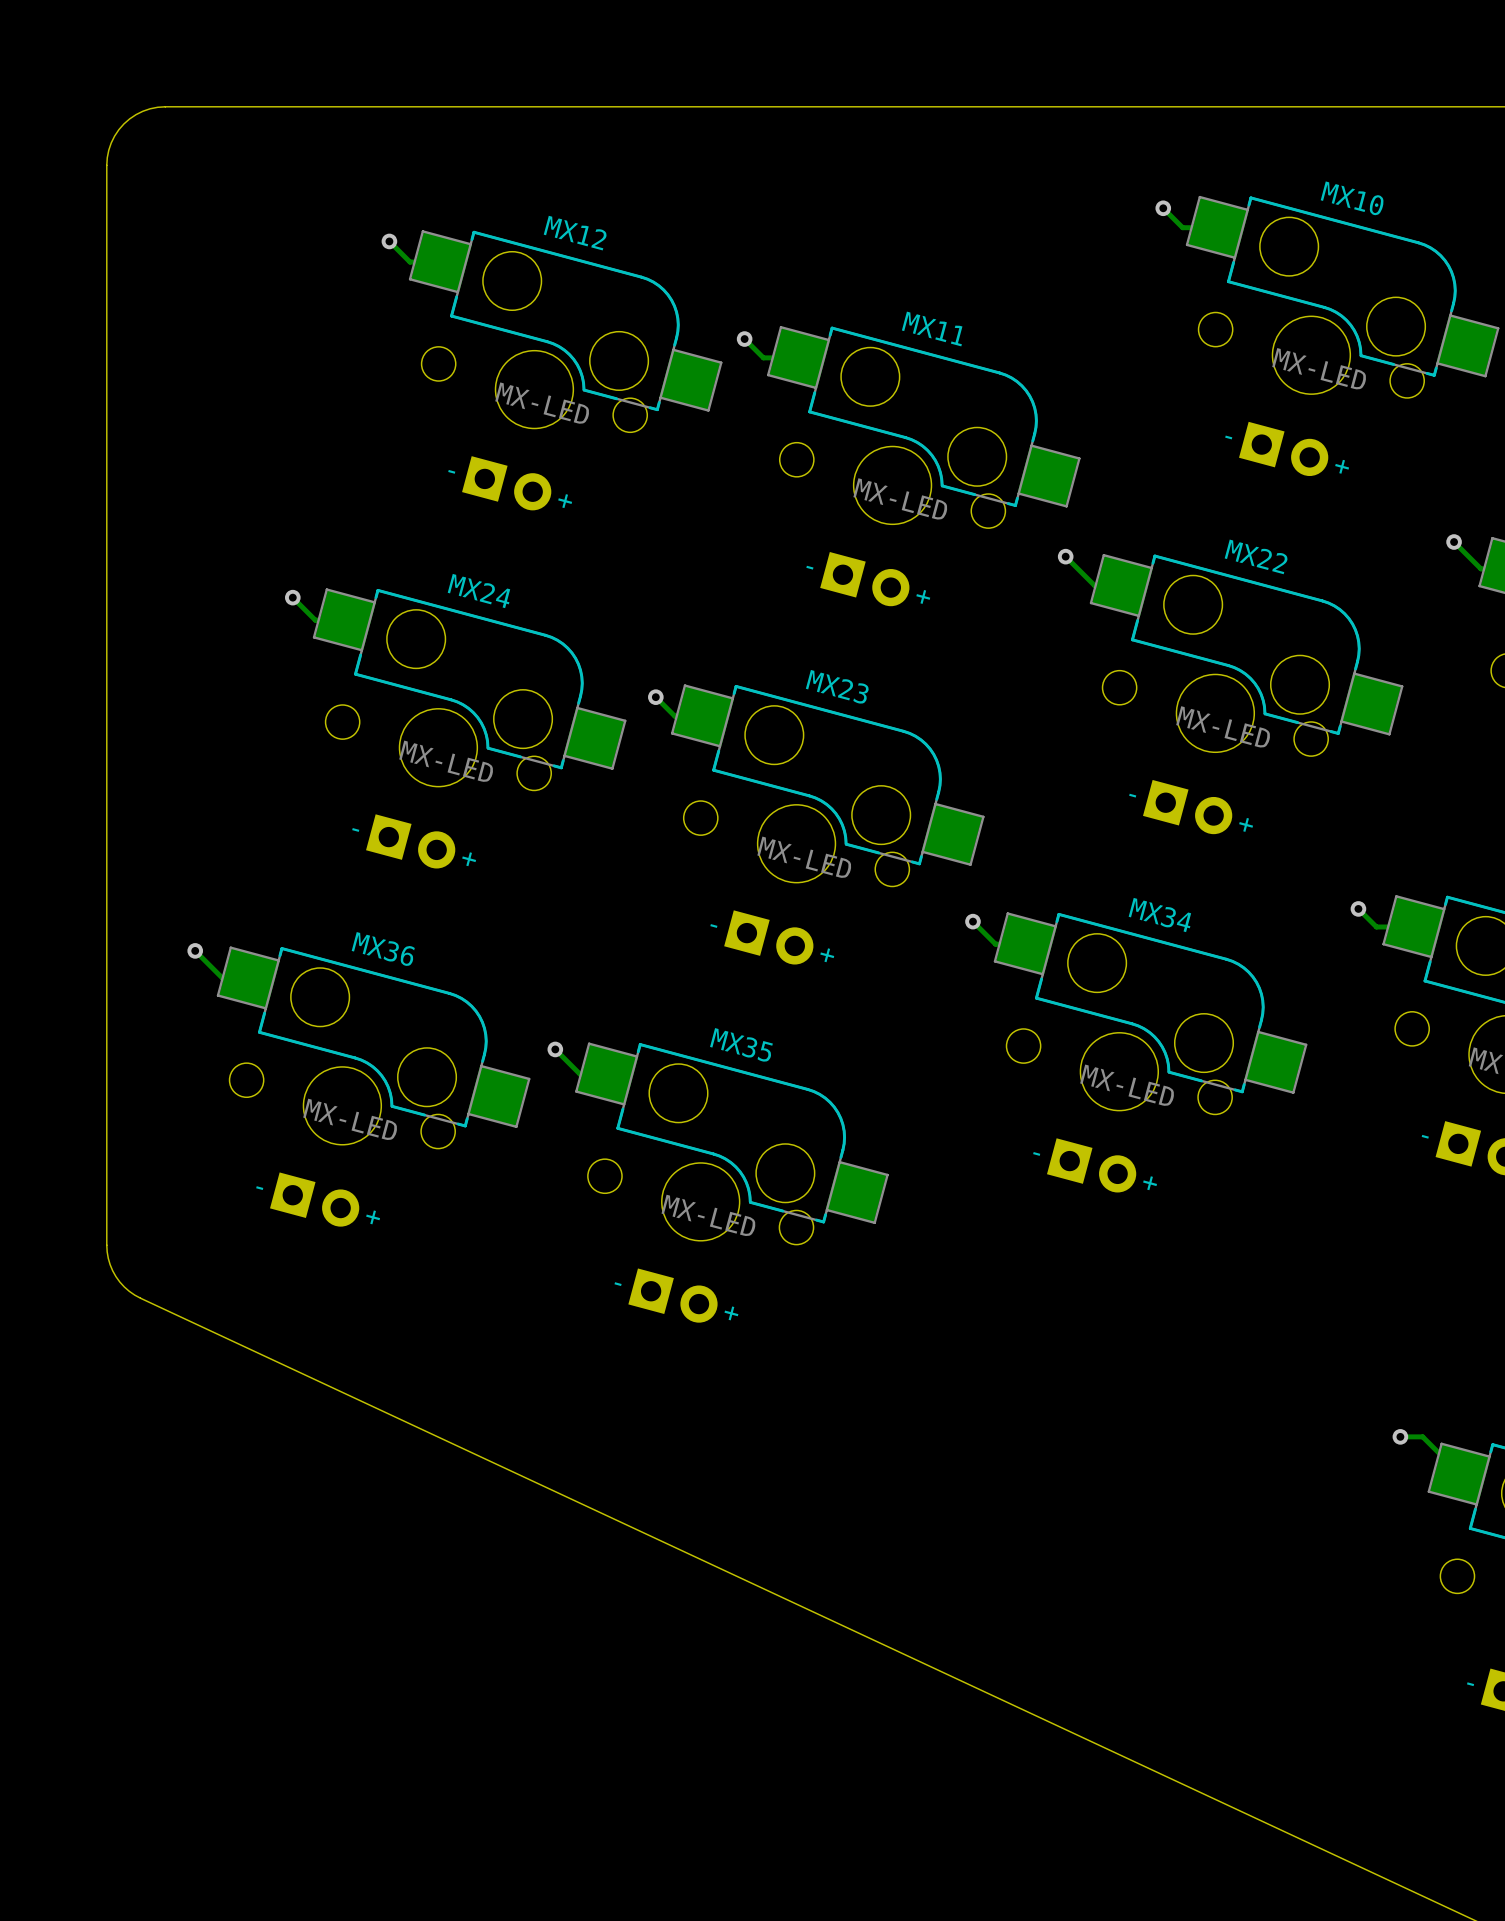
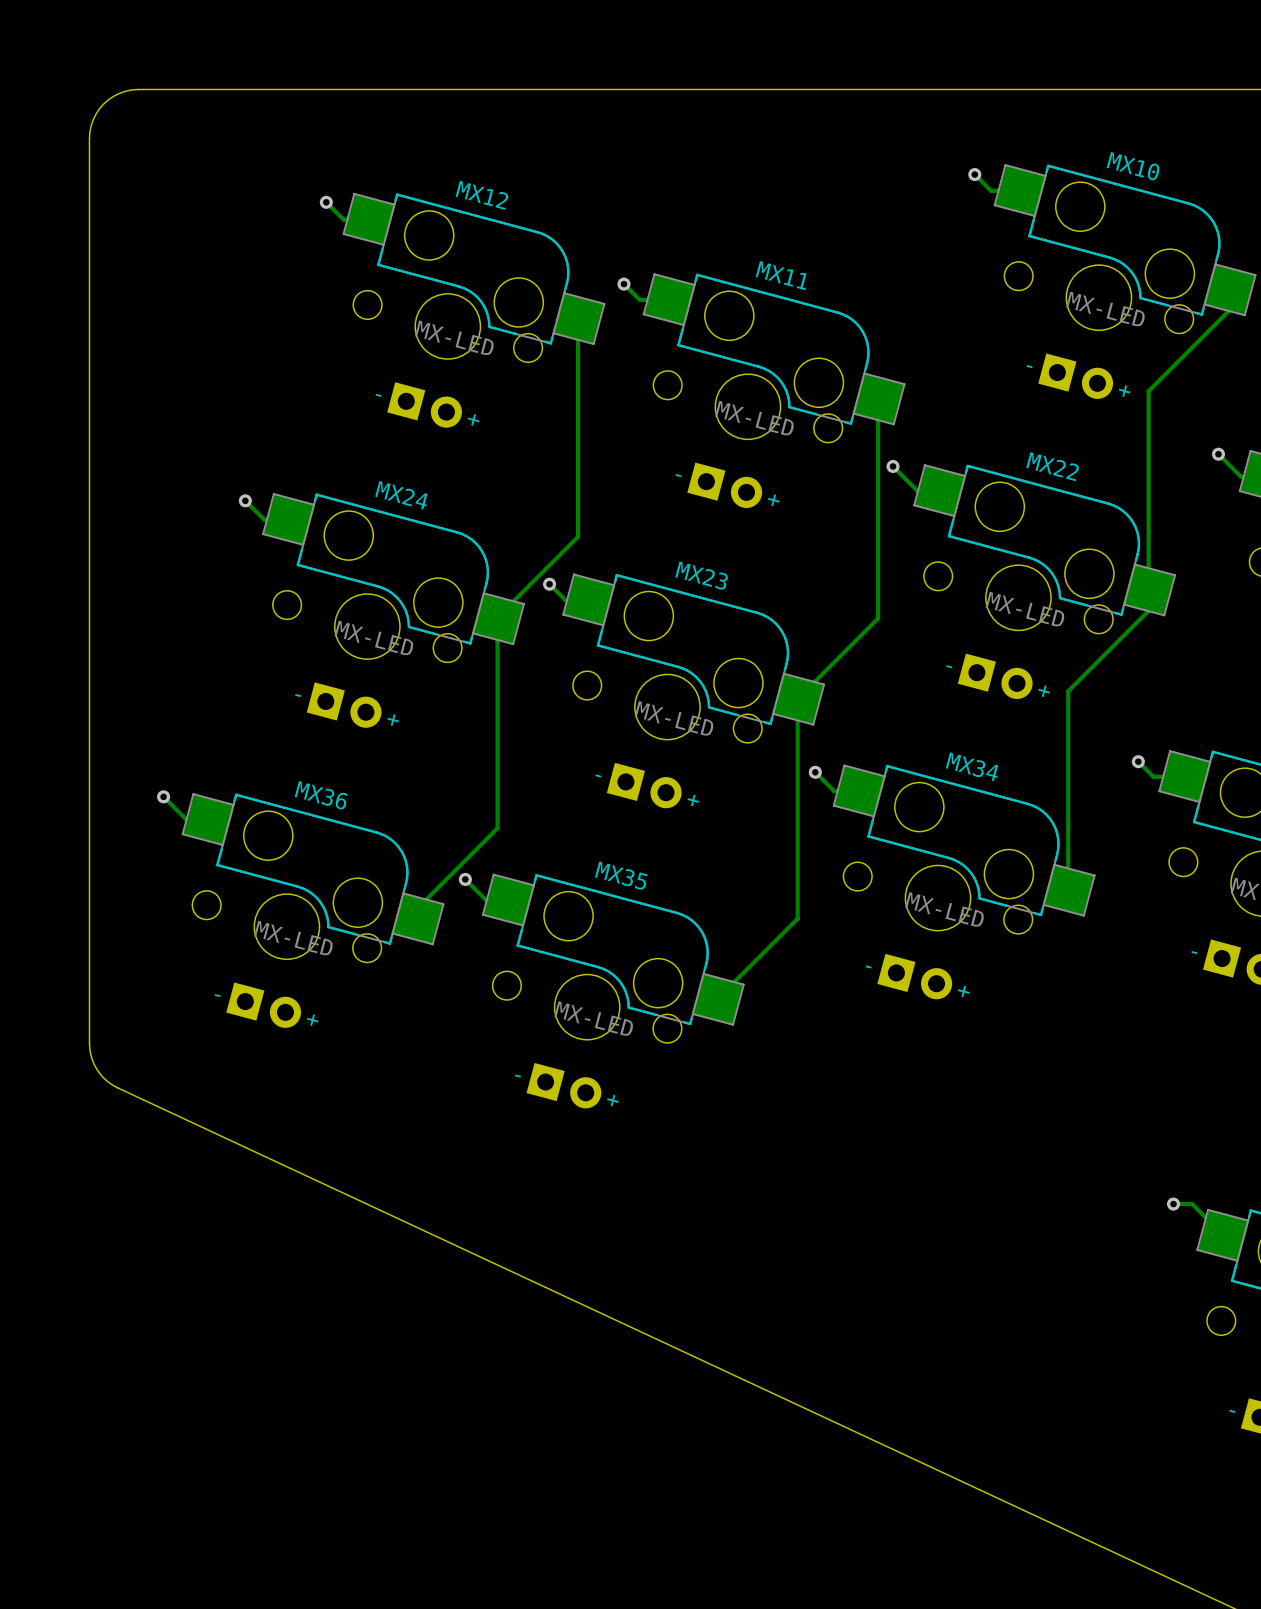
track: none -> (1229, 289) (1229, 310) (1148, 391) (1148, 610) (1068, 691) (1068, 889)
track: none -> (578, 318) (578, 536) (497, 617) (497, 828) (417, 908) (417, 918)
track: none -> (878, 398) (878, 618) (797, 698) (797, 918) (717, 999)

